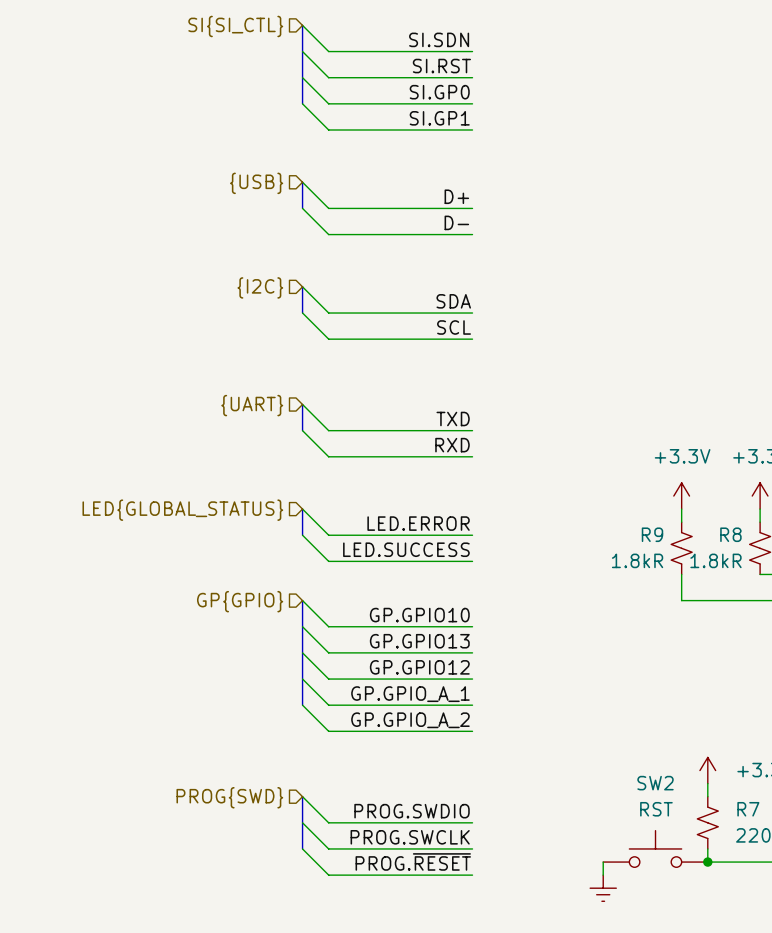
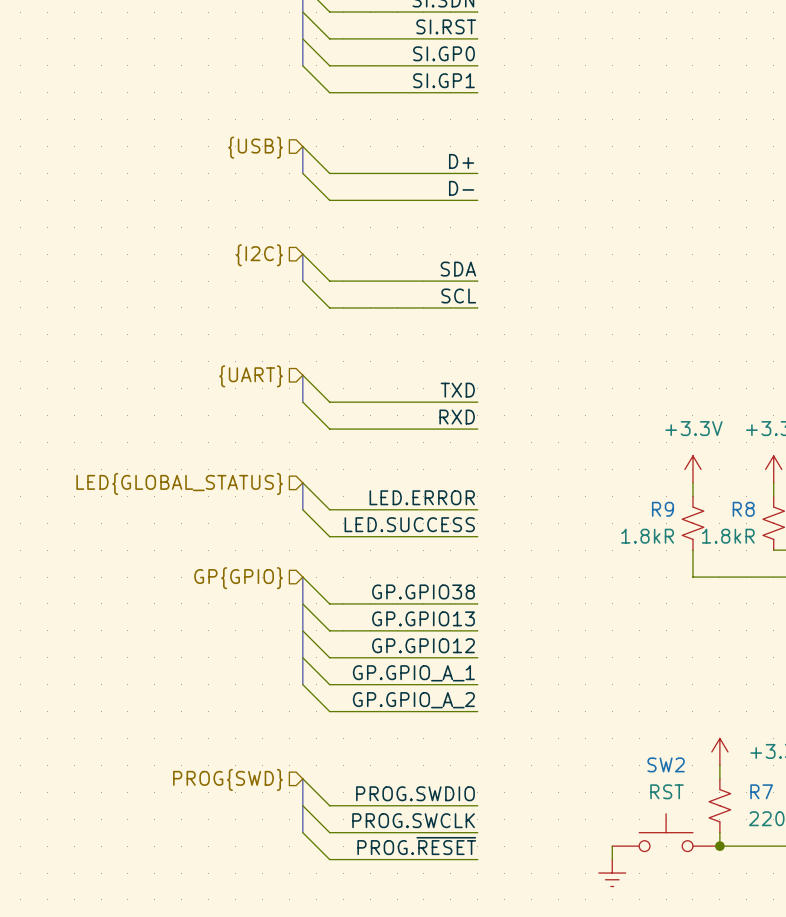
label: GP.GPIO10 (419, 615) -> GP.GPIO38 (423, 591)

